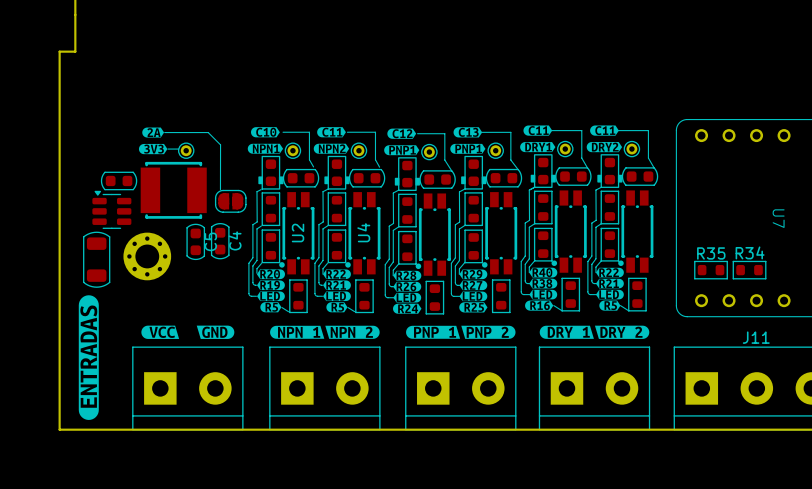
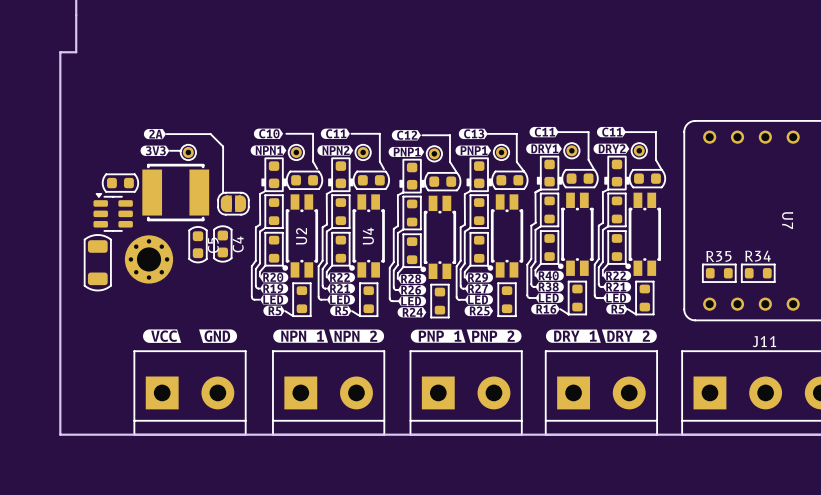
drawing: [78, 295, 99, 420] -> none

